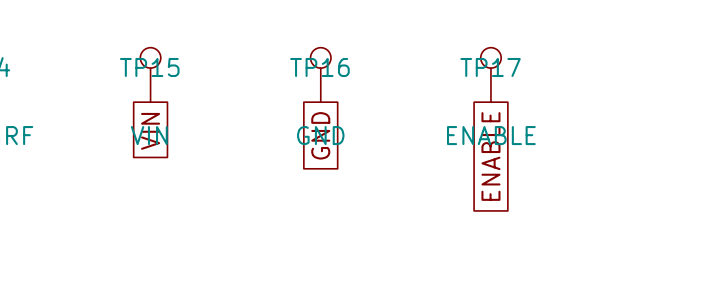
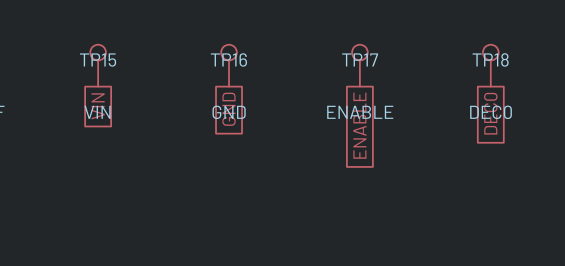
TP18: none -> DEC0 (490, 65)
global label: none -> DEC0 (490, 113)

